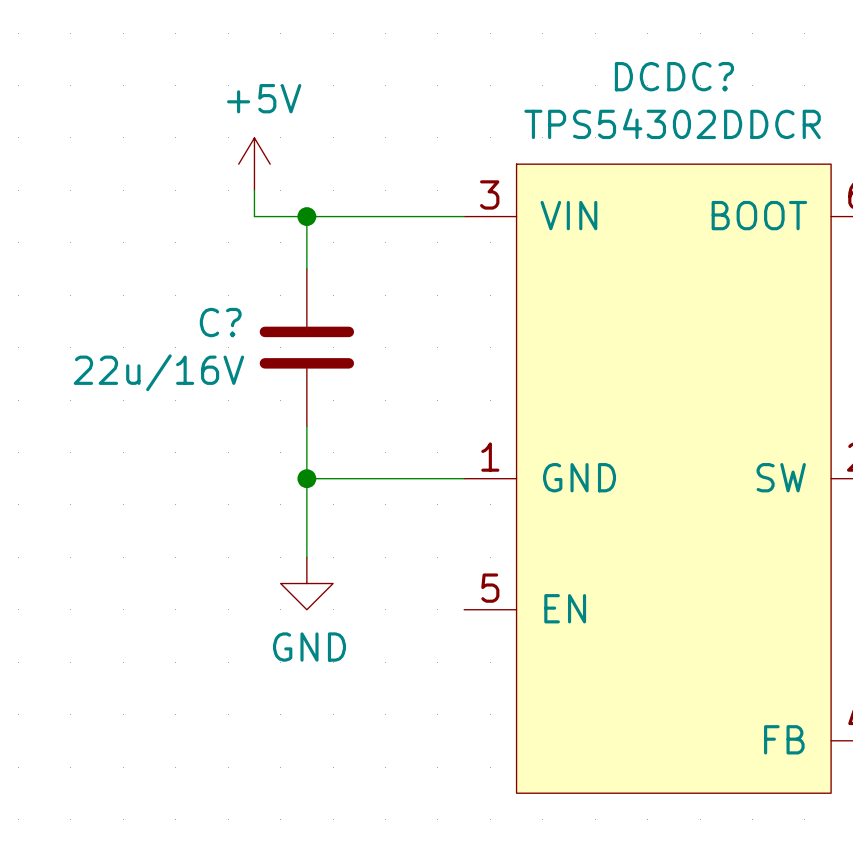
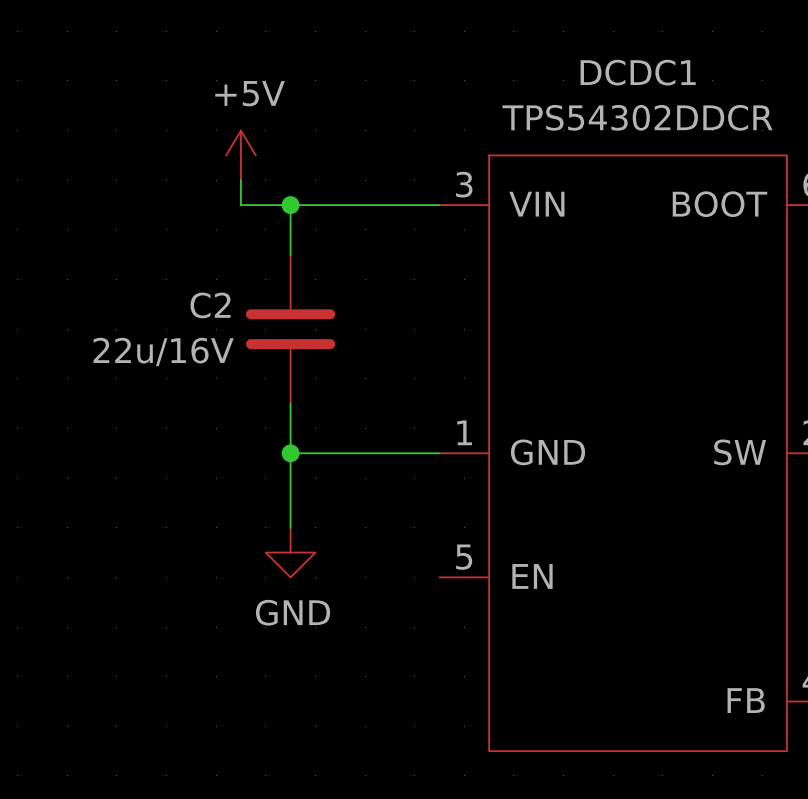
DCDC? name: DCDC? (674, 76) -> DCDC1 (638, 72)
C? name: C? (220, 322) -> C2 (210, 305)

